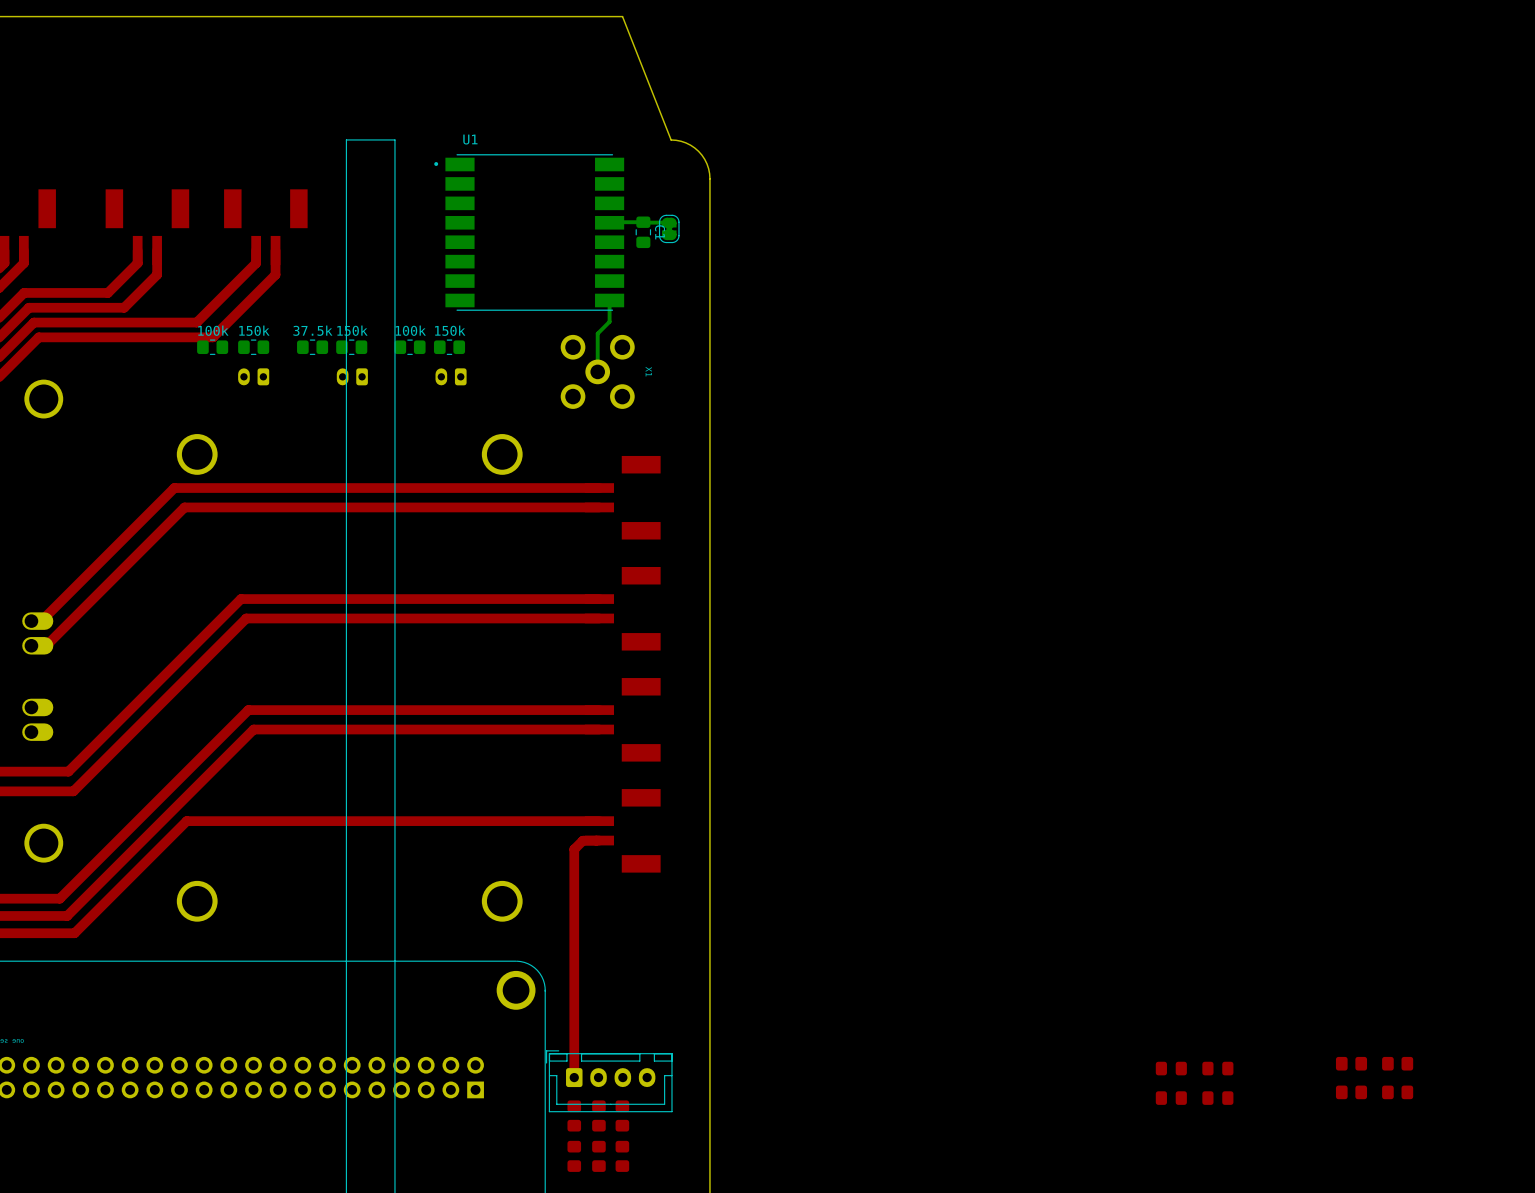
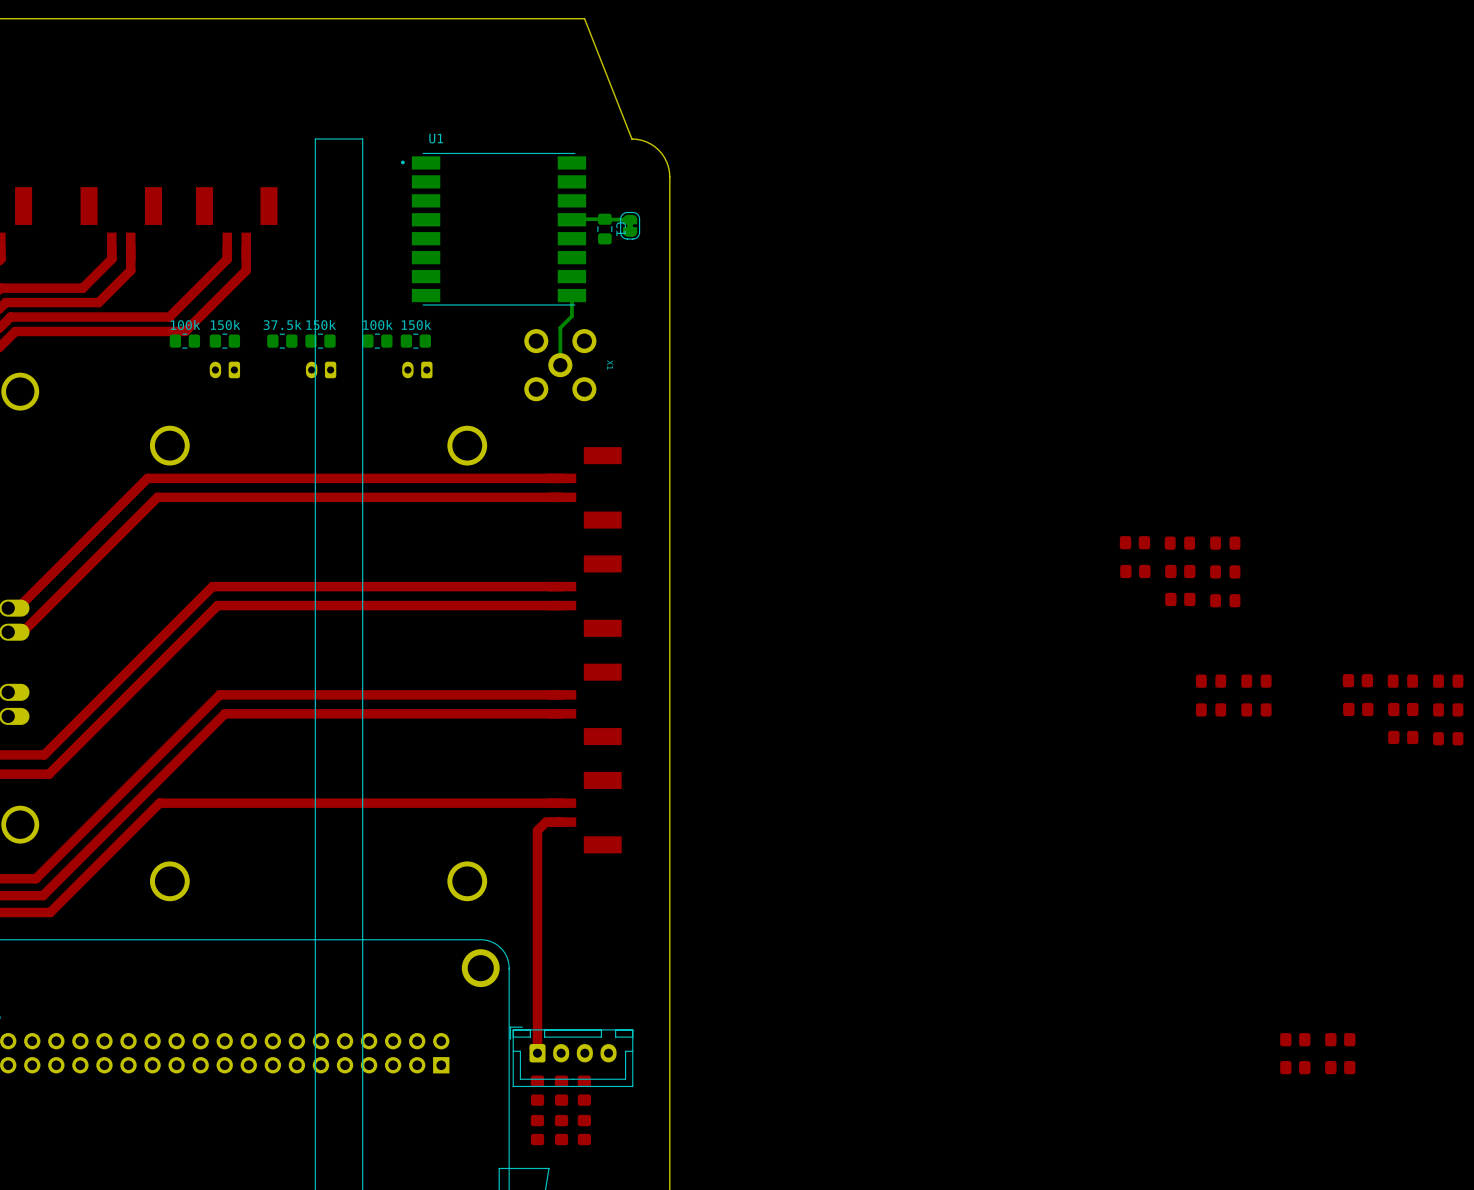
part: none -> (1134, 542)
part: none -> (1179, 543)
part: none -> (1225, 543)
part: none -> (1135, 571)
part: none -> (1180, 571)
part: none -> (1225, 571)
part: none -> (1180, 599)
part: none -> (1225, 600)
part: none -> (1211, 681)
part: none -> (1256, 681)
part: none -> (1357, 680)
part: none -> (1402, 681)
part: none -> (1448, 681)
part: none -> (1211, 709)
part: none -> (1256, 709)
part: none -> (1358, 709)
part: none -> (1403, 709)
part: none -> (1448, 709)
part: none -> (1403, 737)
part: none -> (1448, 738)
part: (1171, 1068) -> none
part: (1217, 1068) -> none
part: (1171, 1098) -> none
part: (1217, 1098) -> none

